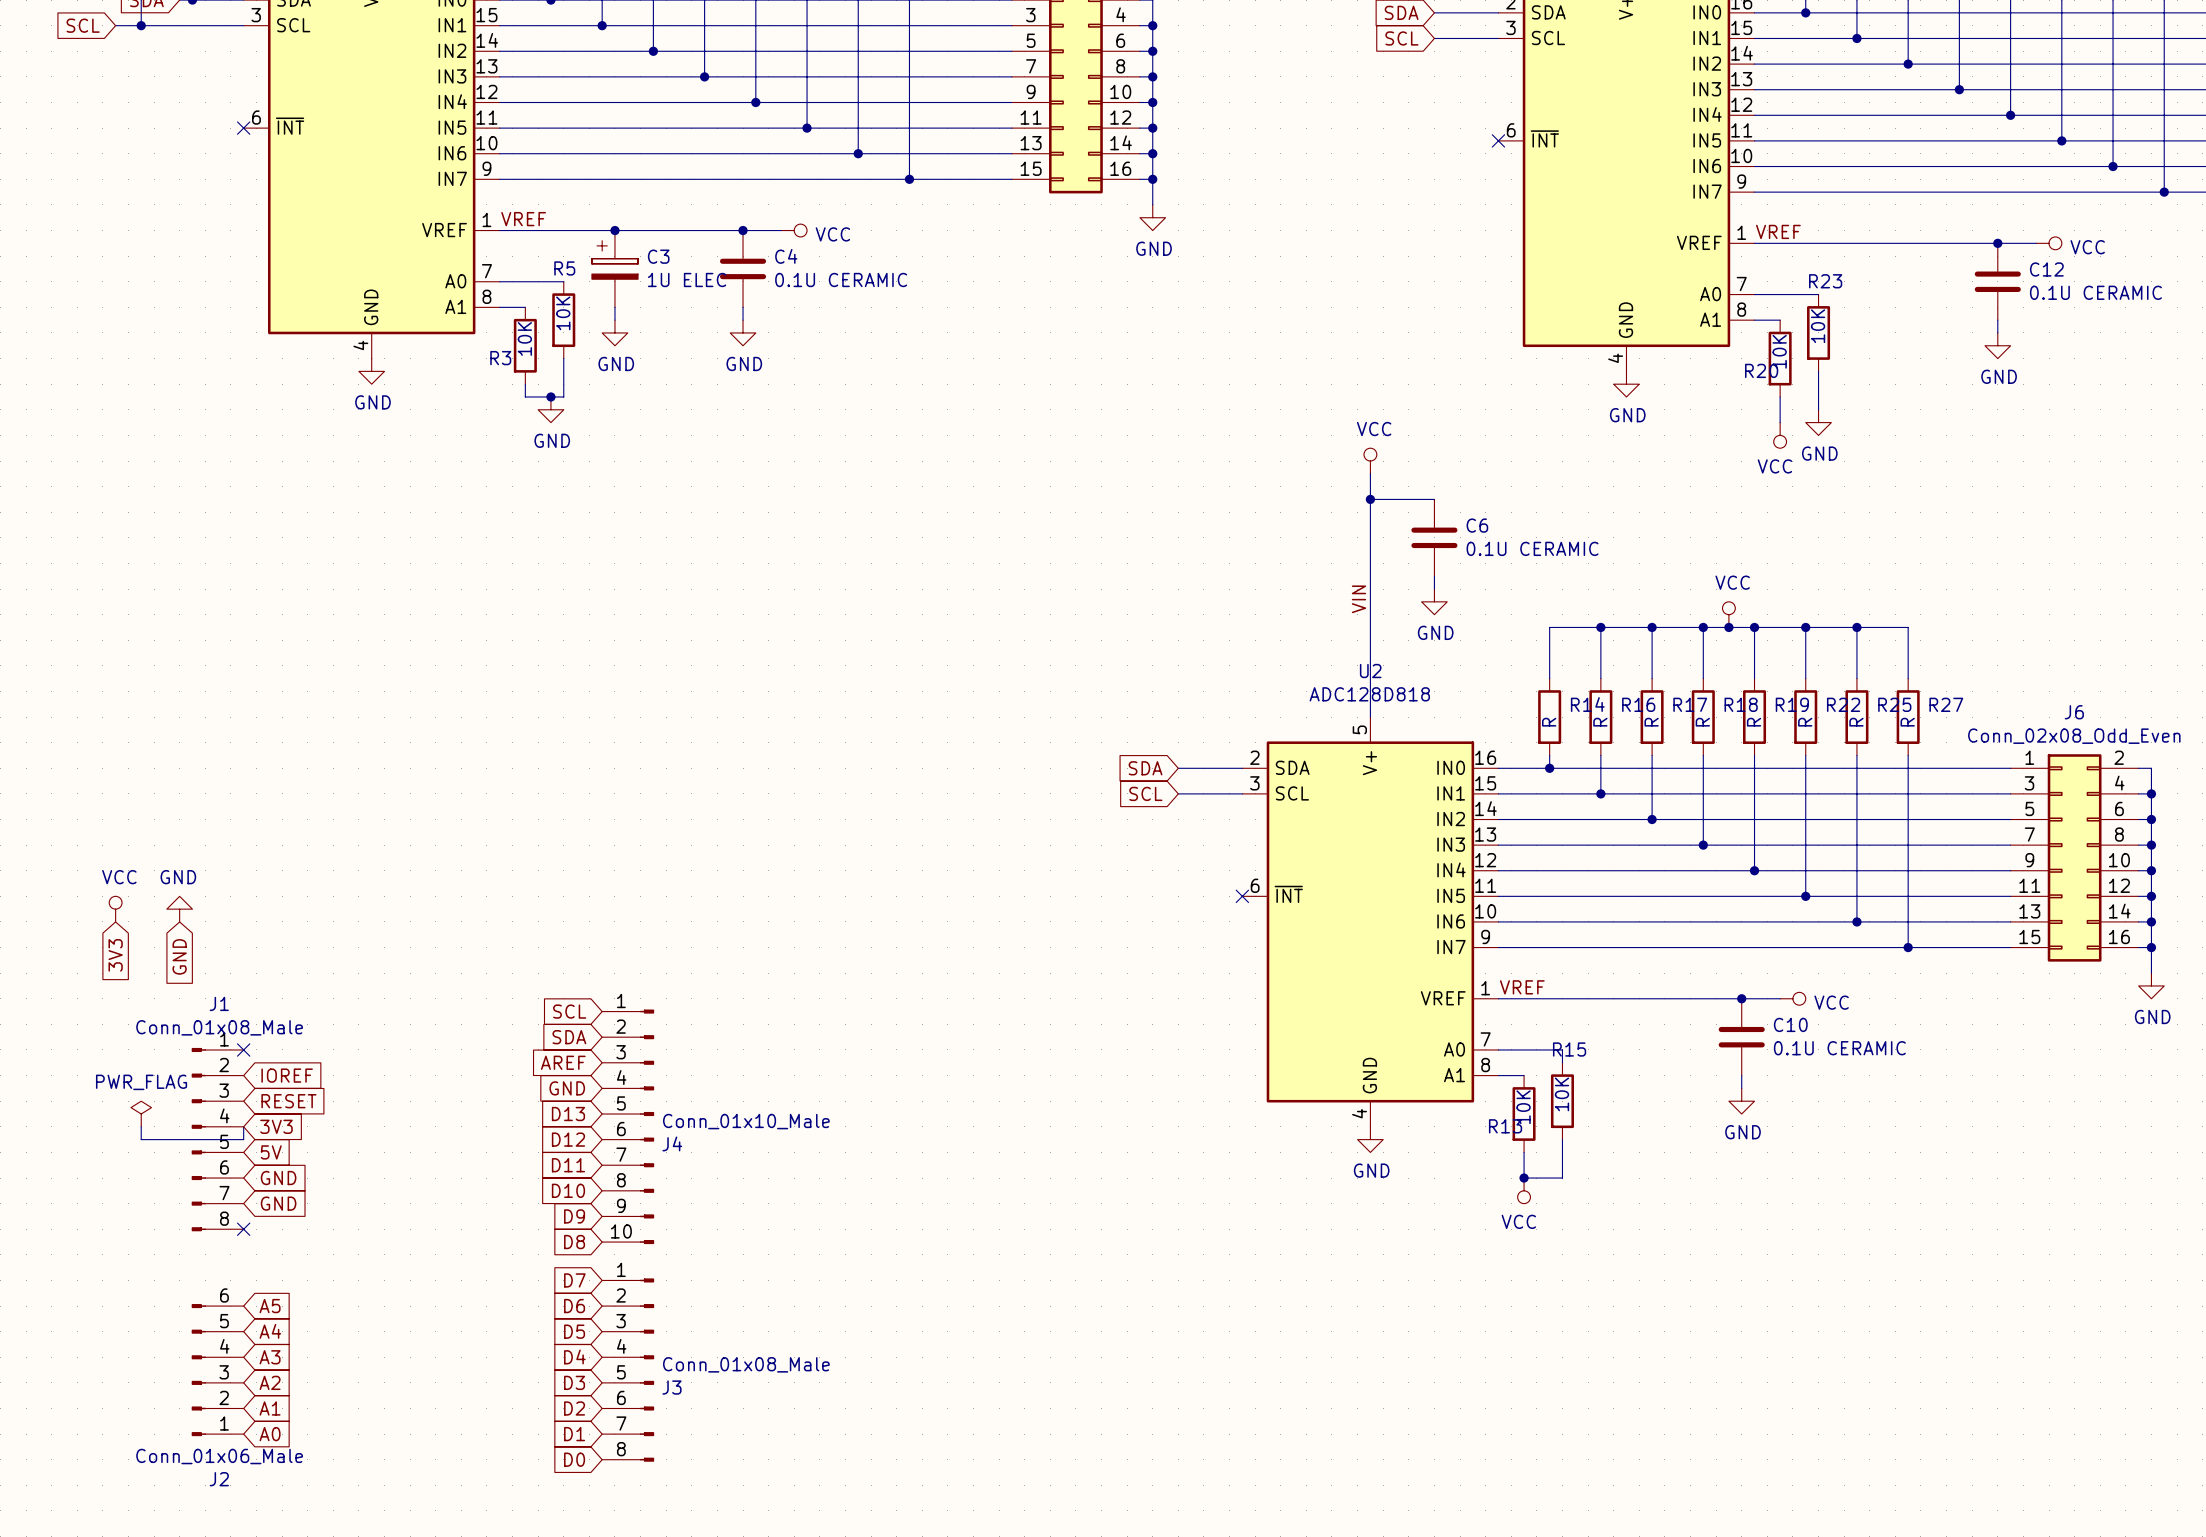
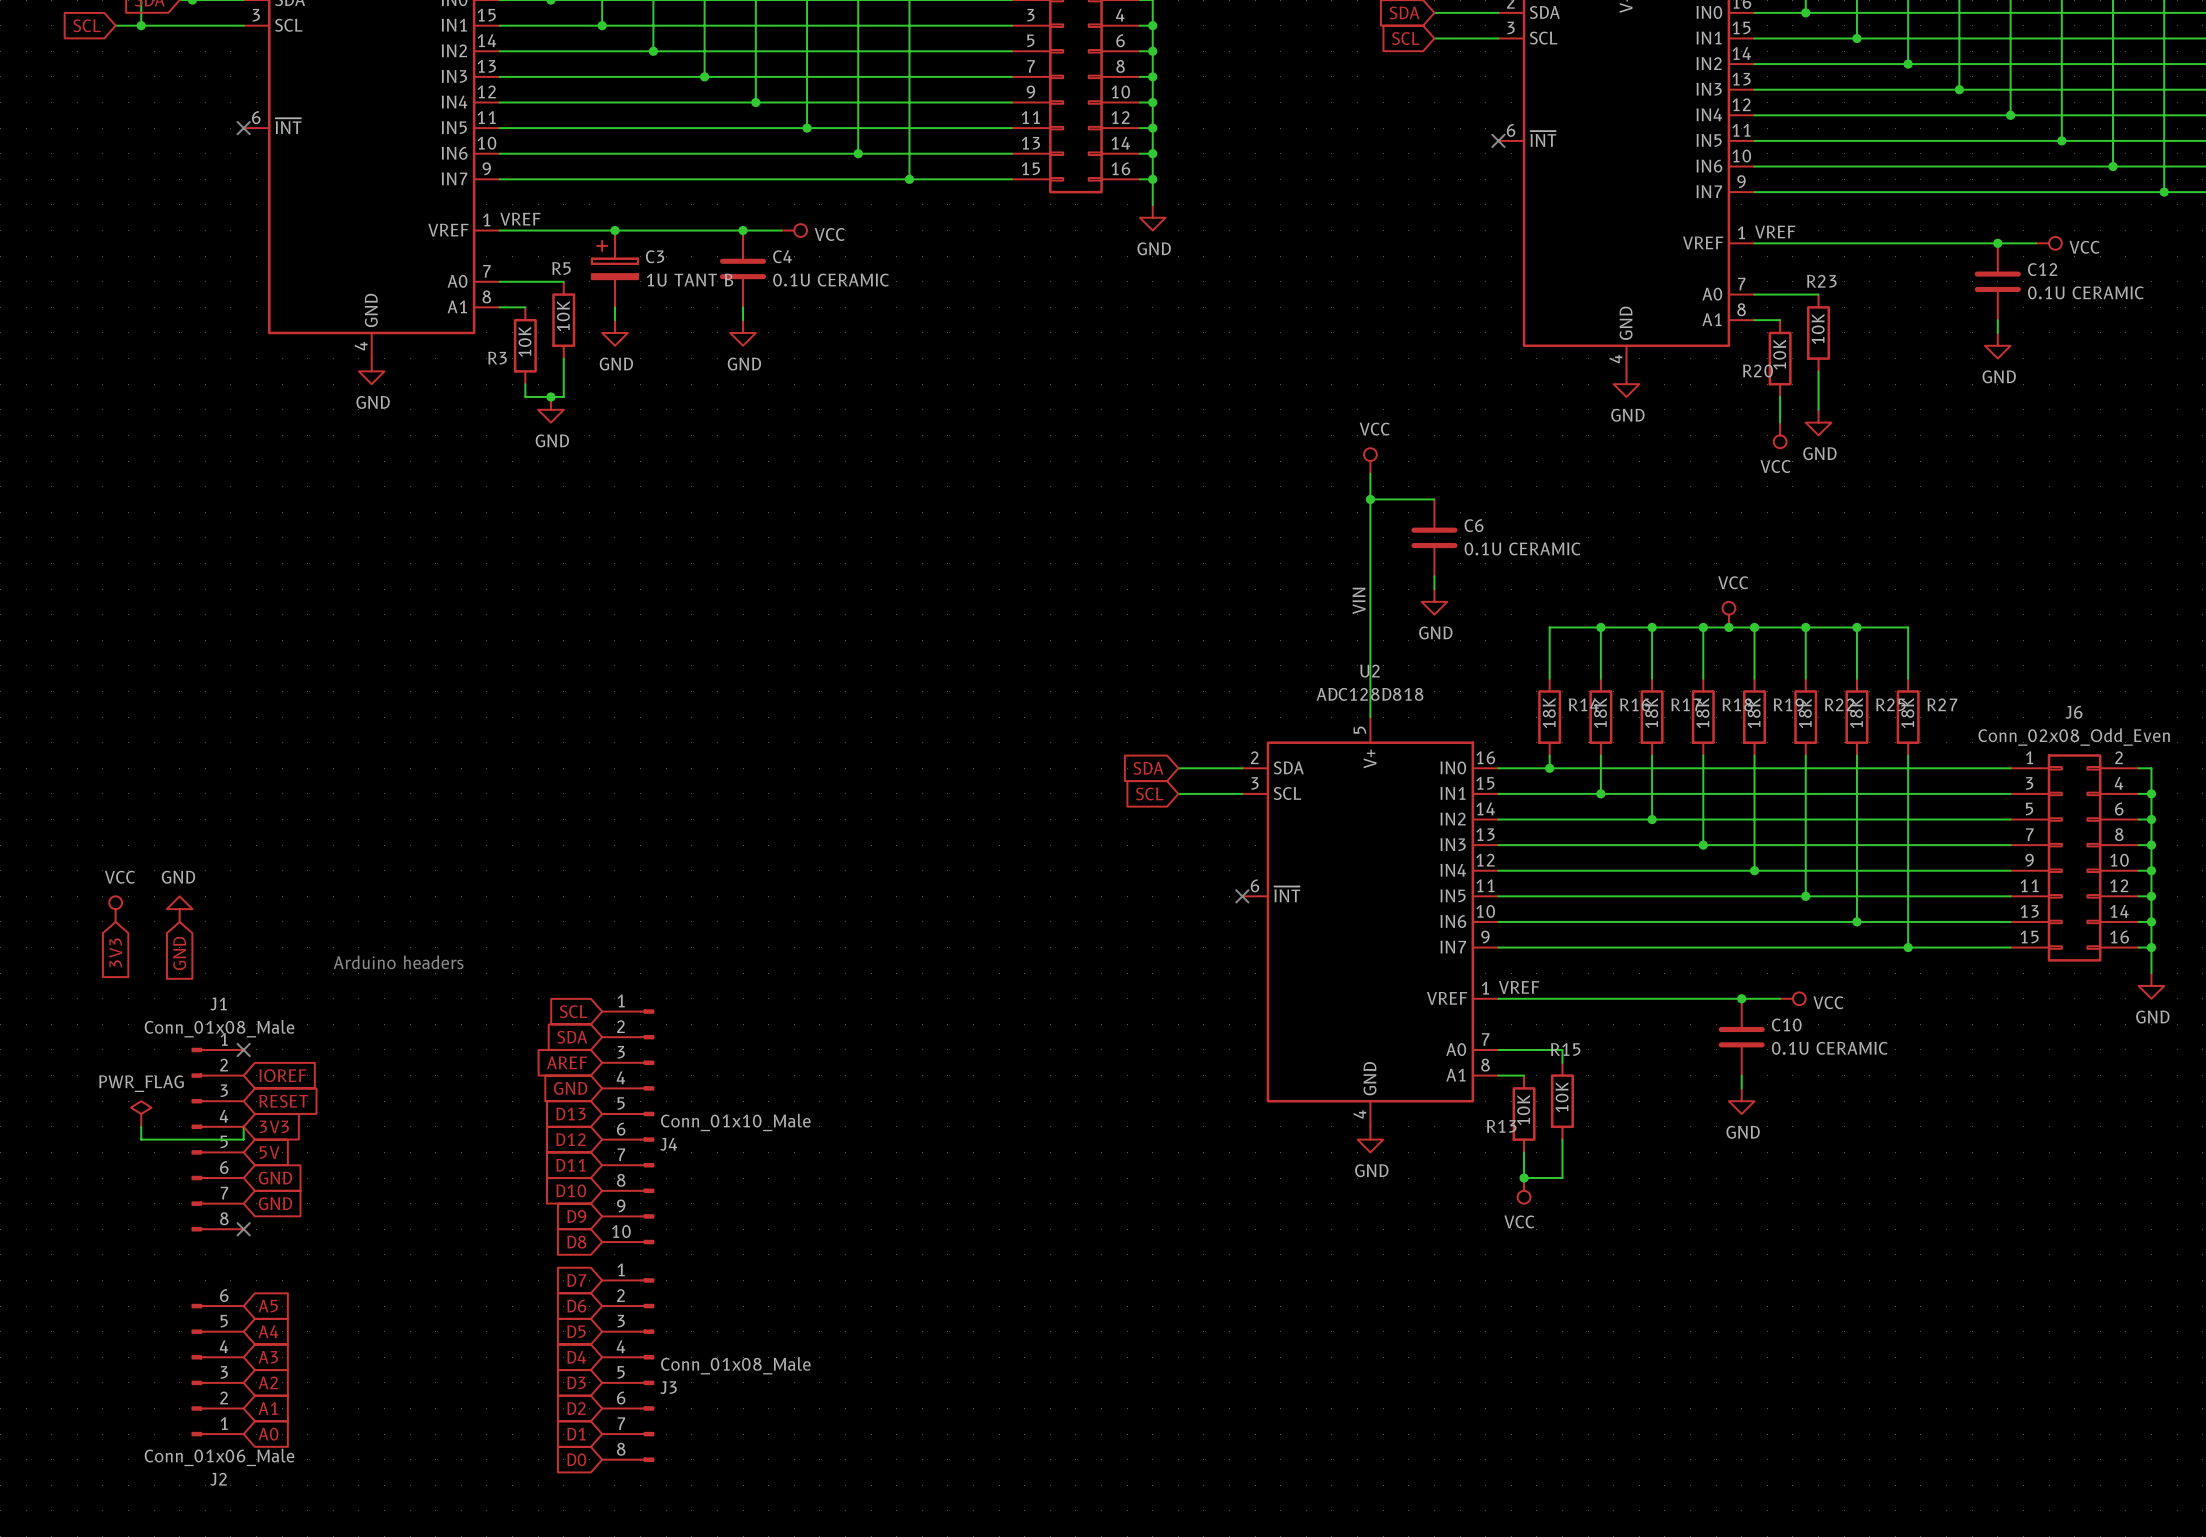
C3 value: 1U ELEC (687, 279) -> 1U TANT B (690, 280)
R14 value: R (1549, 722) -> 18K (1549, 713)
R16 value: R (1600, 722) -> 18K (1600, 713)
R17 value: R (1651, 722) -> 18K (1651, 713)
R18 value: R (1702, 722) -> 18K (1702, 713)
R19 value: R (1754, 722) -> 18K (1754, 713)
R22 value: R (1805, 722) -> 18k (1804, 713)
R25 value: R (1856, 722) -> 18K (1856, 713)
R27 value: R (1907, 722) -> 18K (1907, 713)
text: none -> Arduino headers (398, 962)

